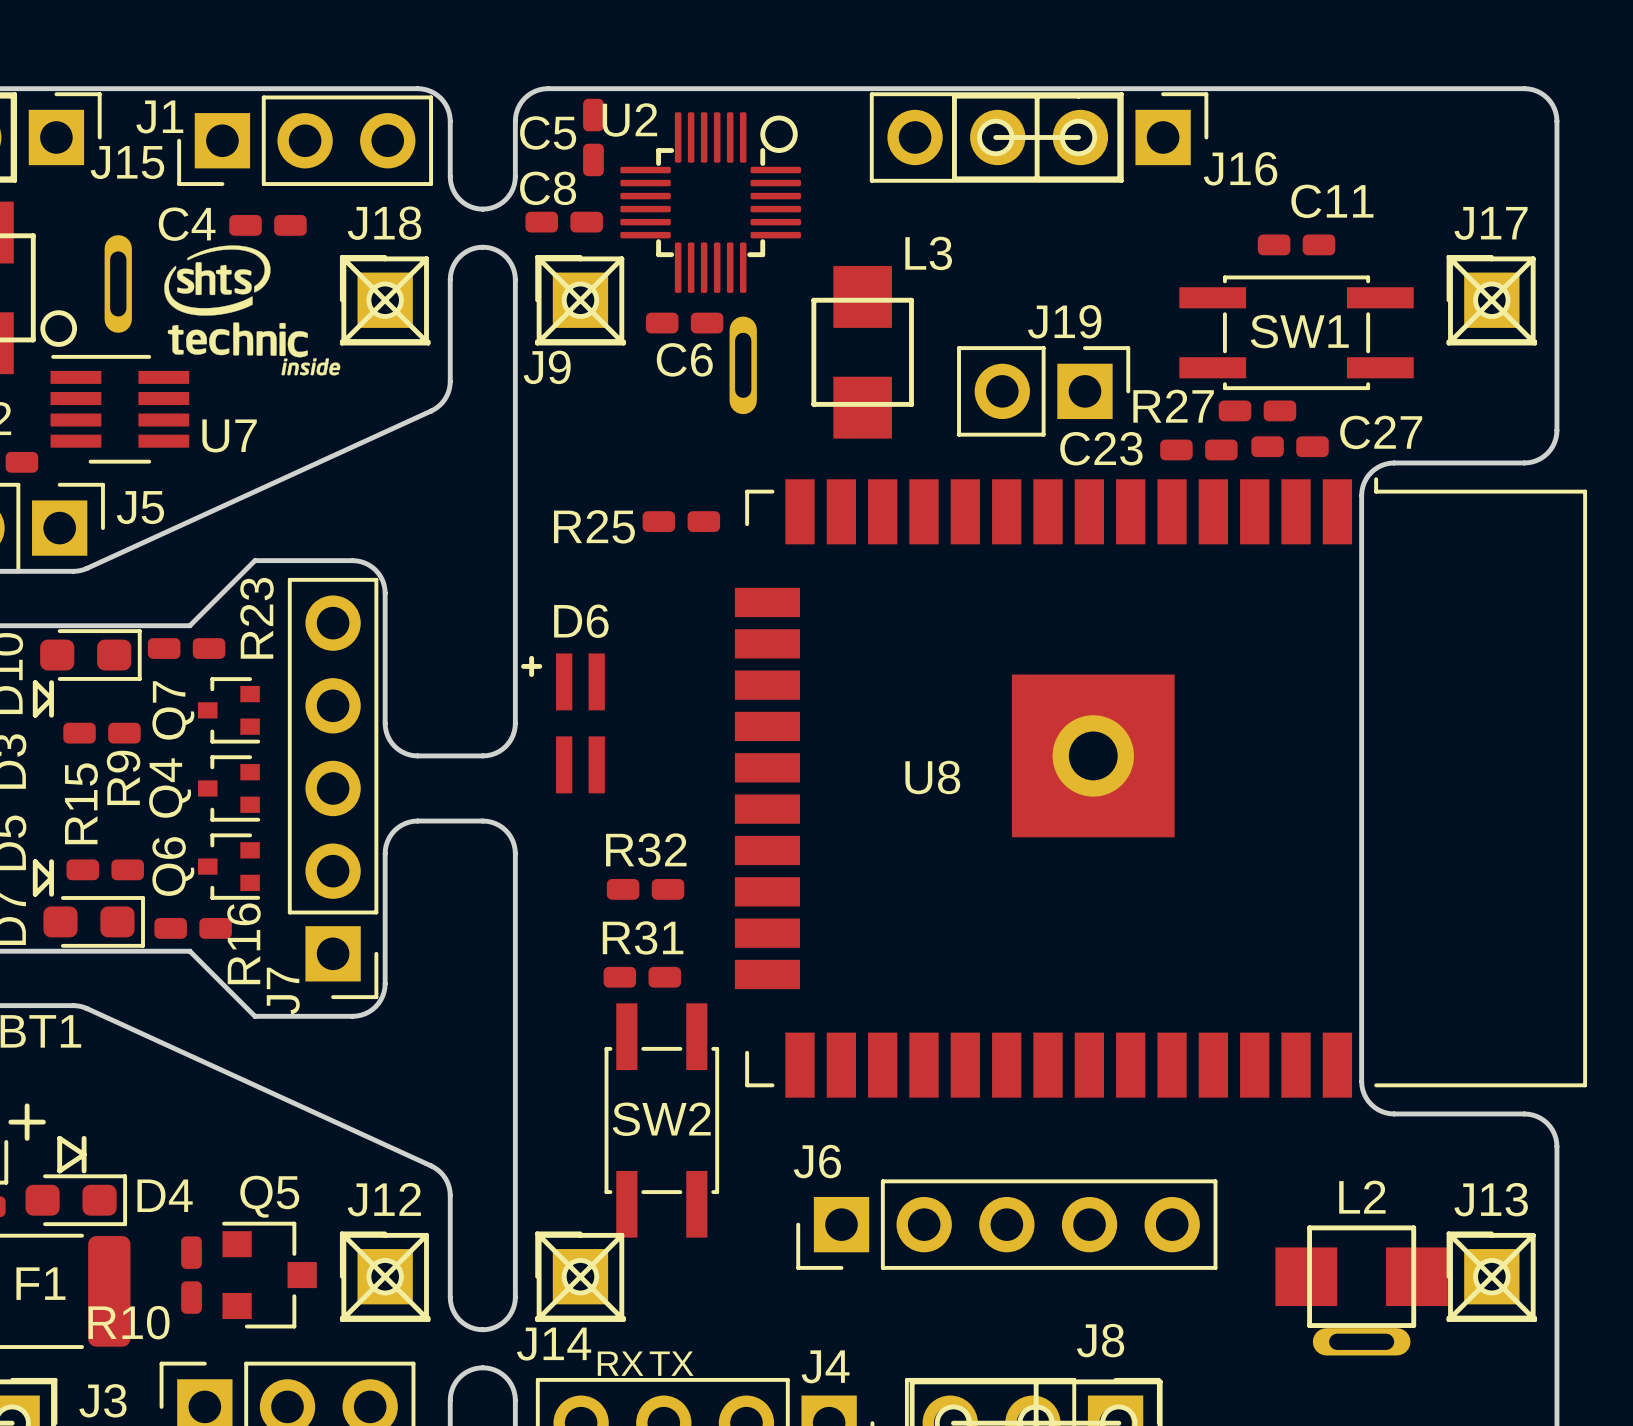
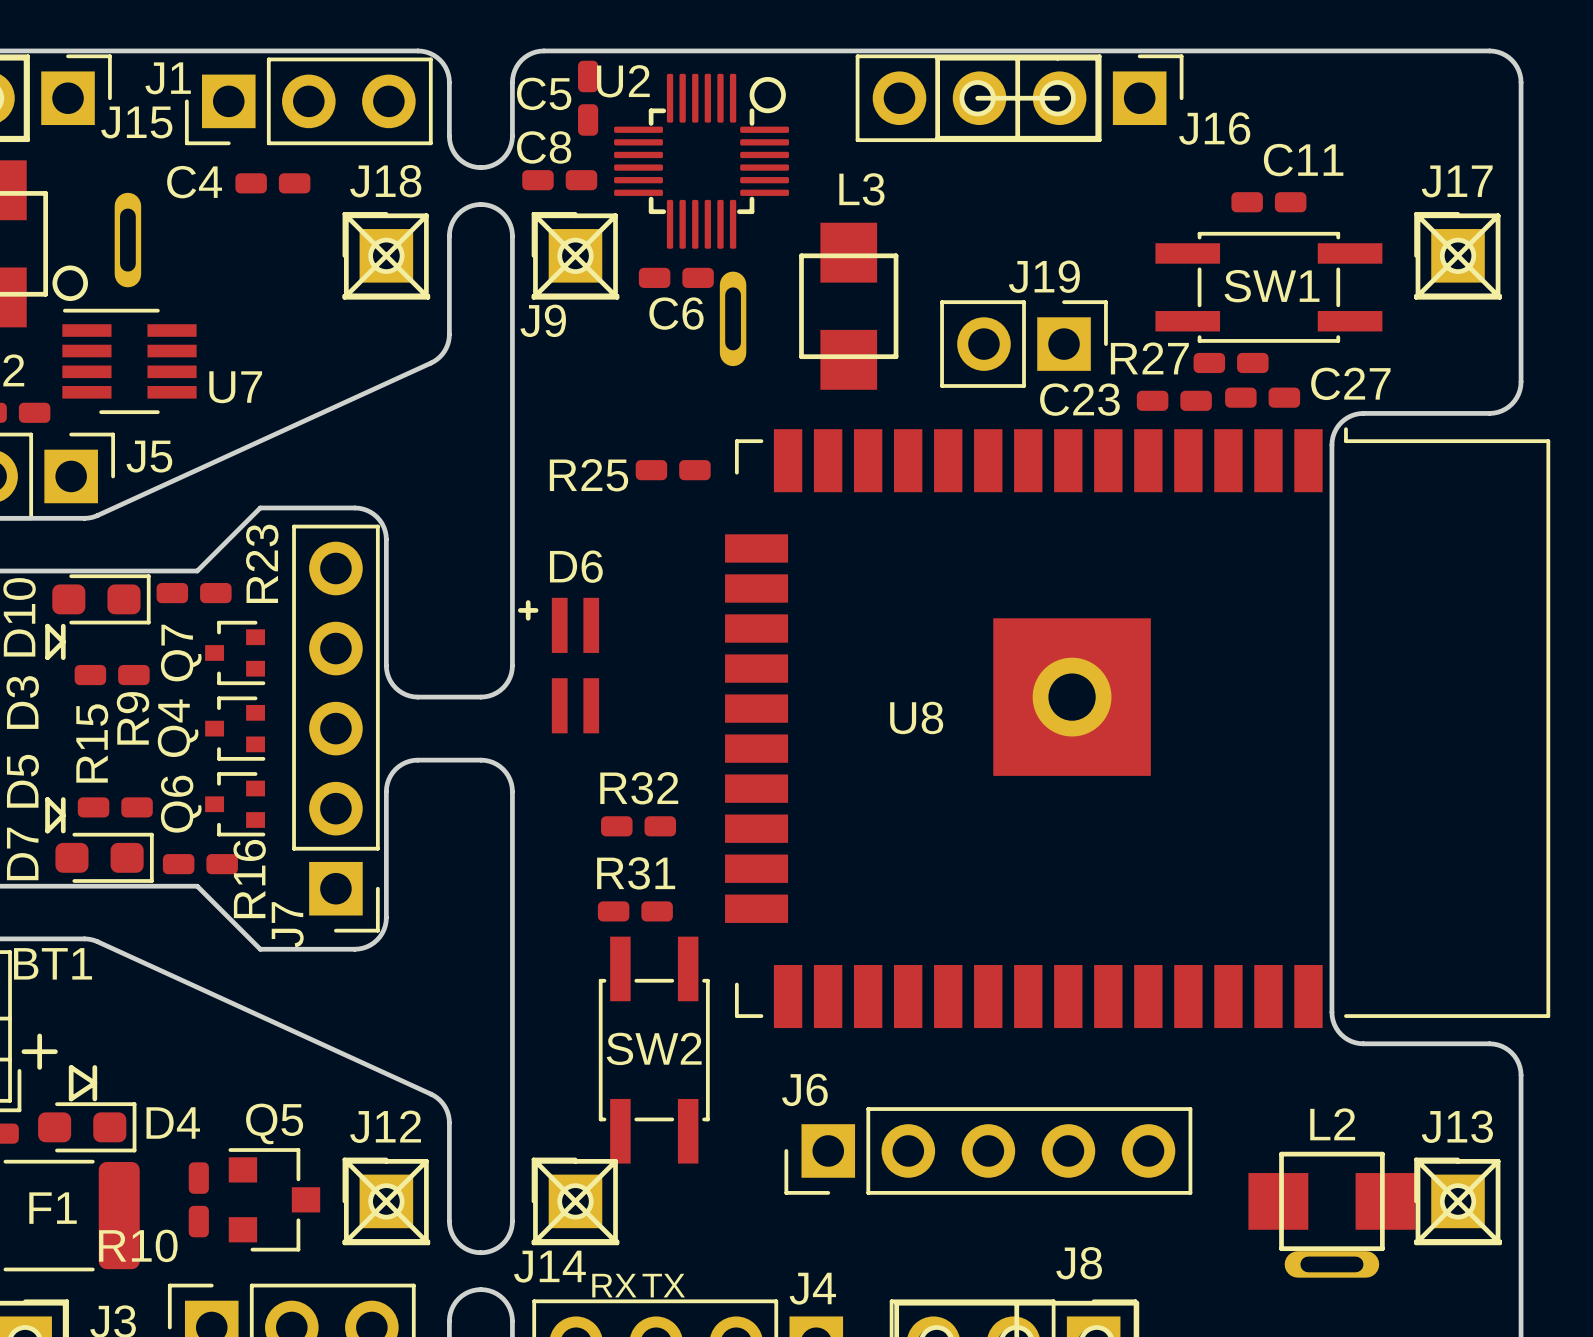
drawing: [164, 245, 341, 376] -> none
L3 name position: L3 (928, 253) -> L3 (861, 189)

